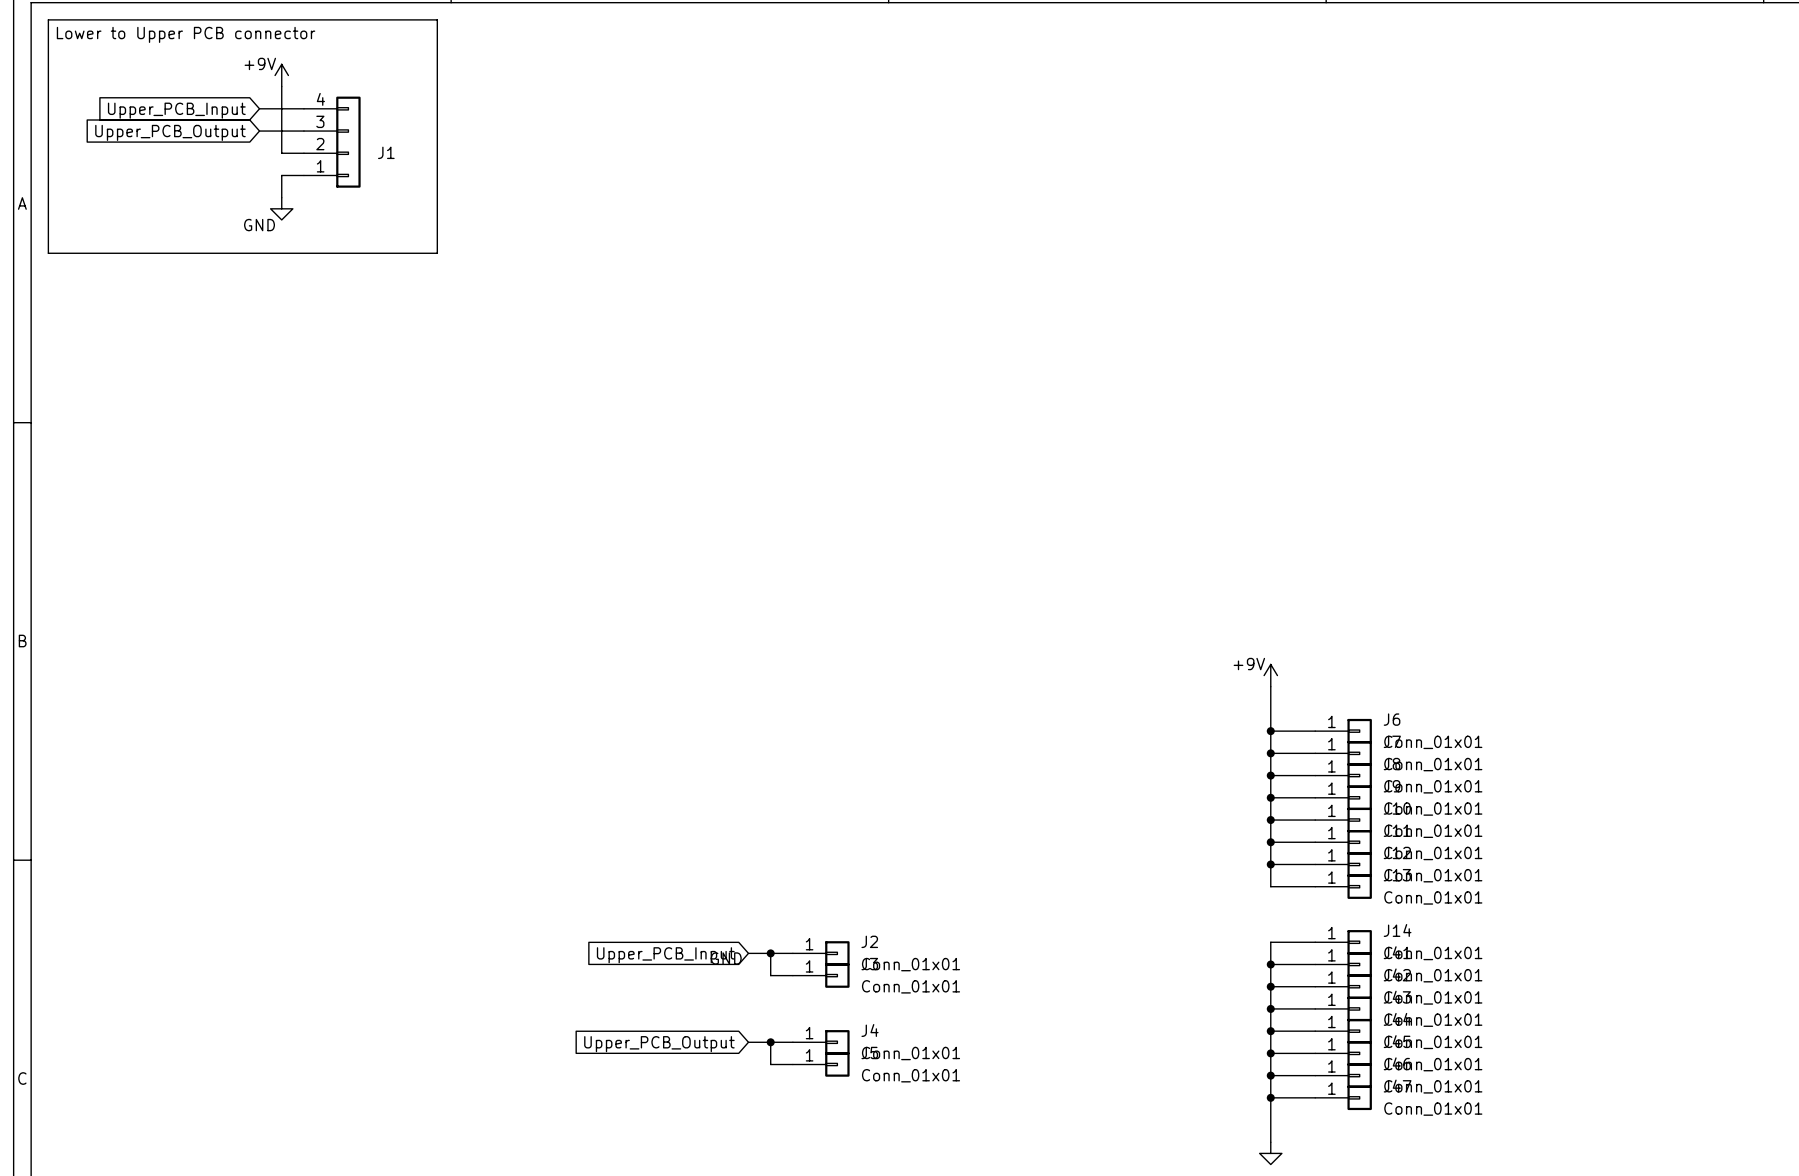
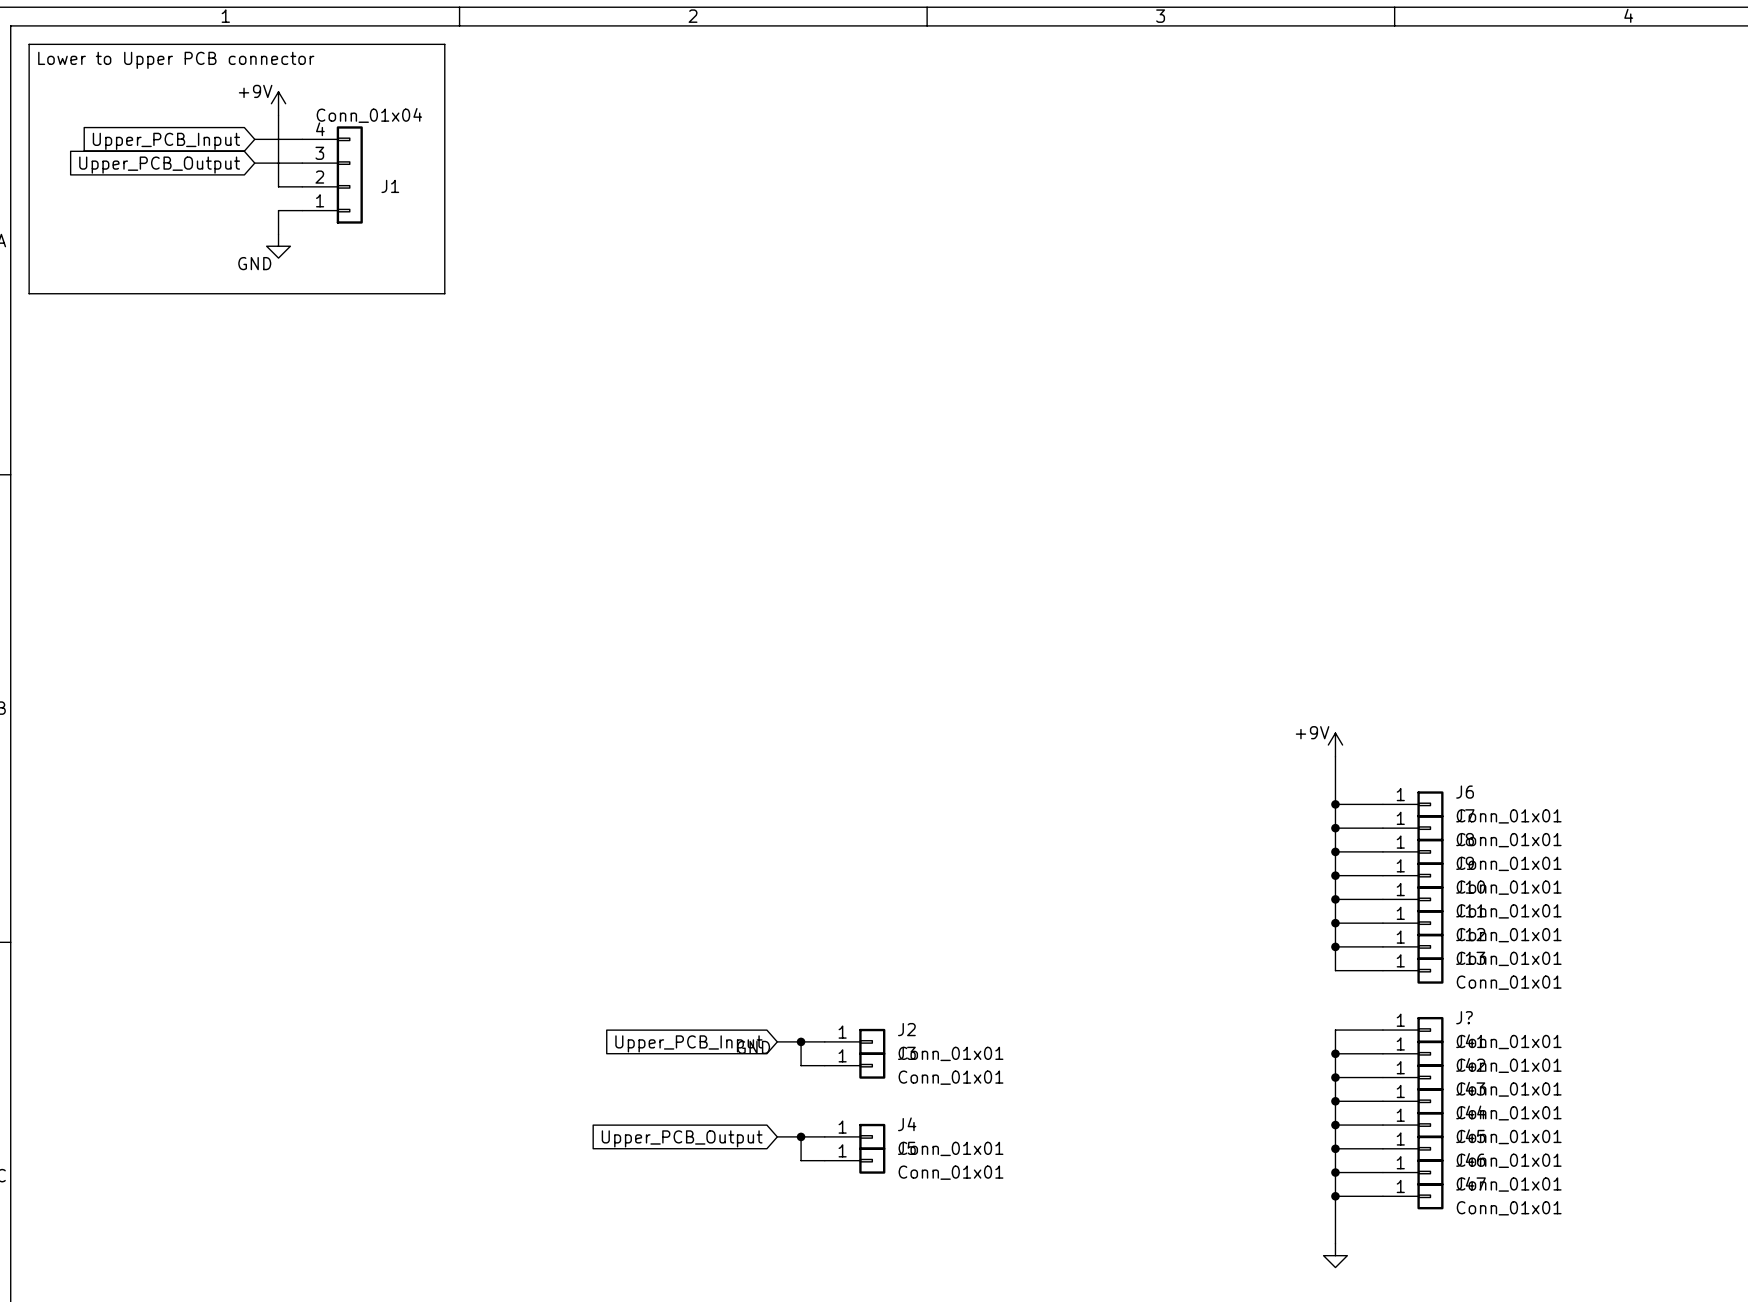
J1 value: none -> Conn_01x04 (369, 115)
J14 name: J14 (1397, 930) -> J? (1464, 1017)

